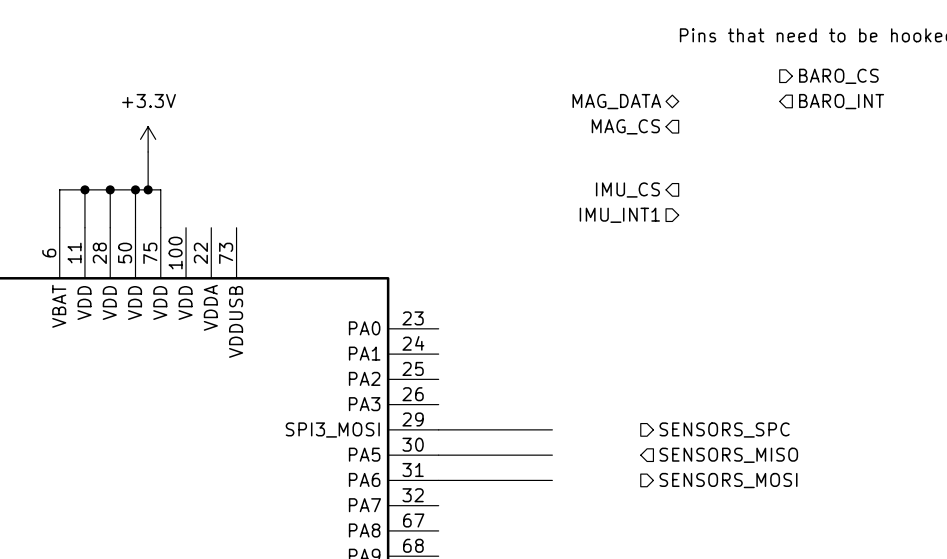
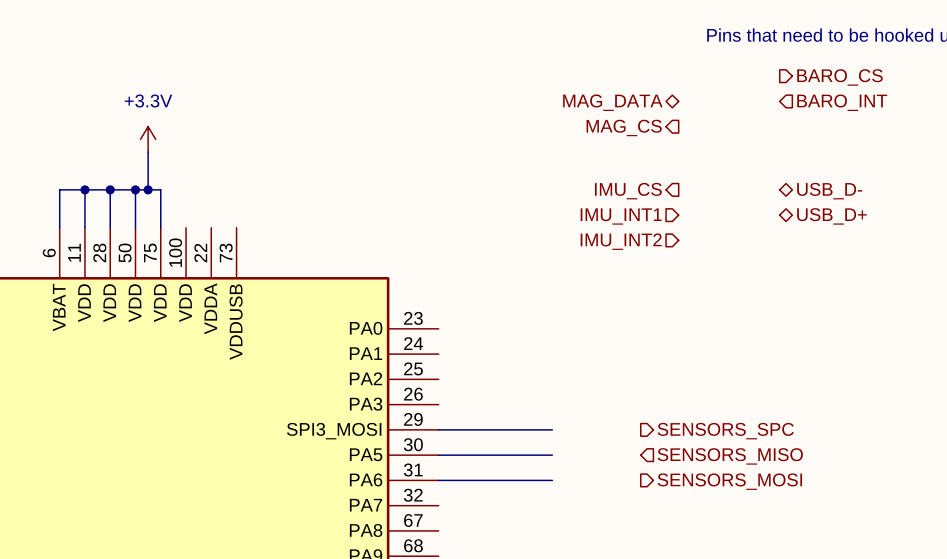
hierarchical label: none -> USB_D- (829, 191)
hierarchical label: none -> USB_D+ (832, 216)
hierarchical label: none -> IMU_INT2 (621, 241)

